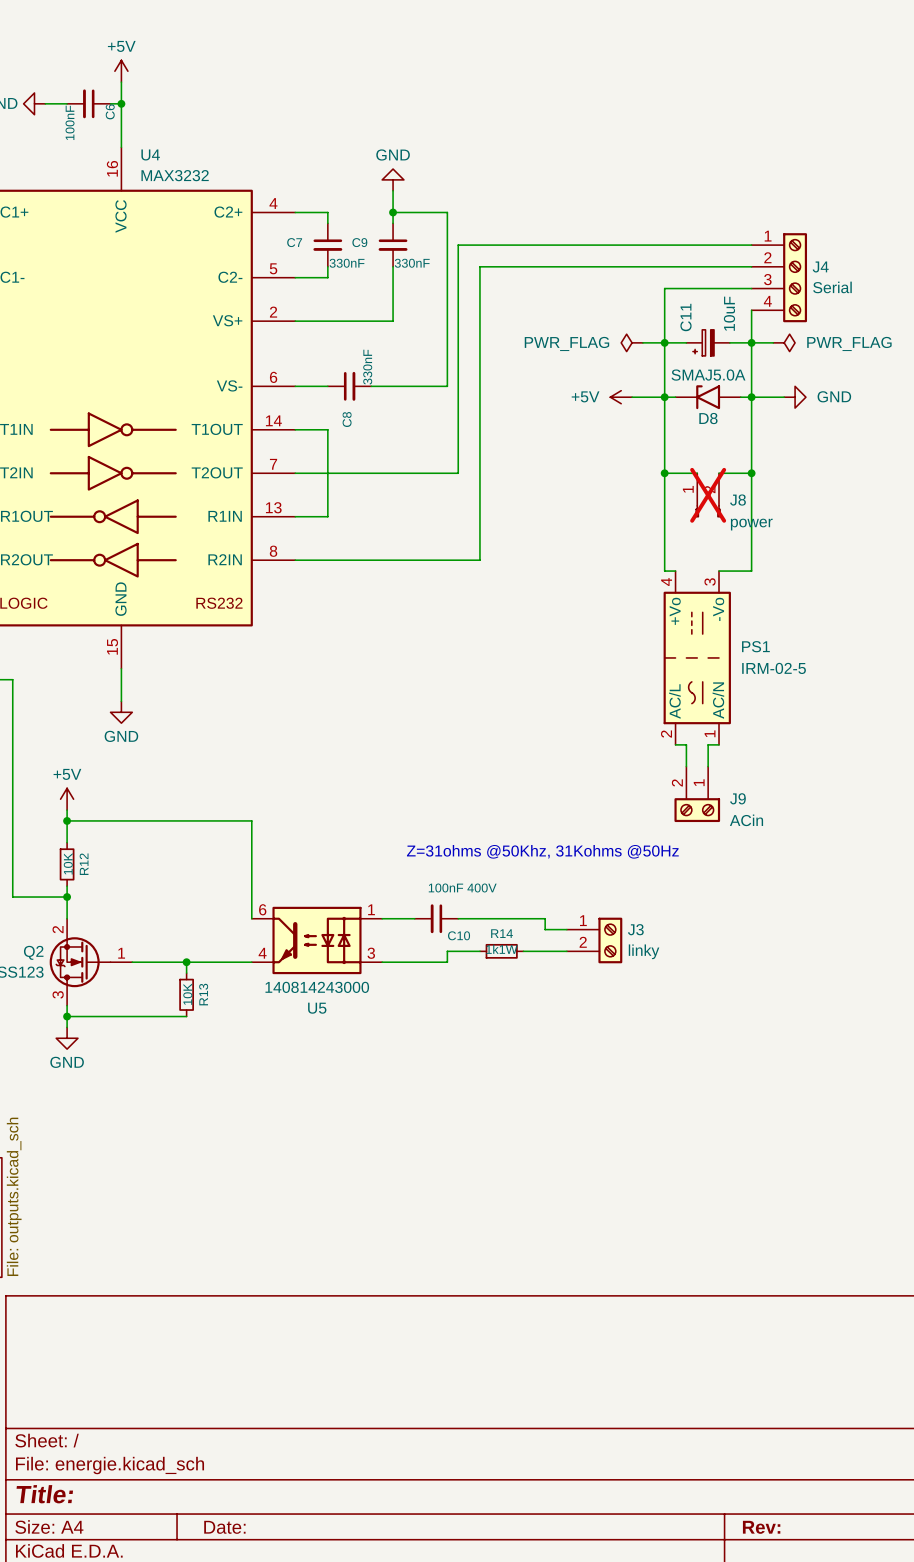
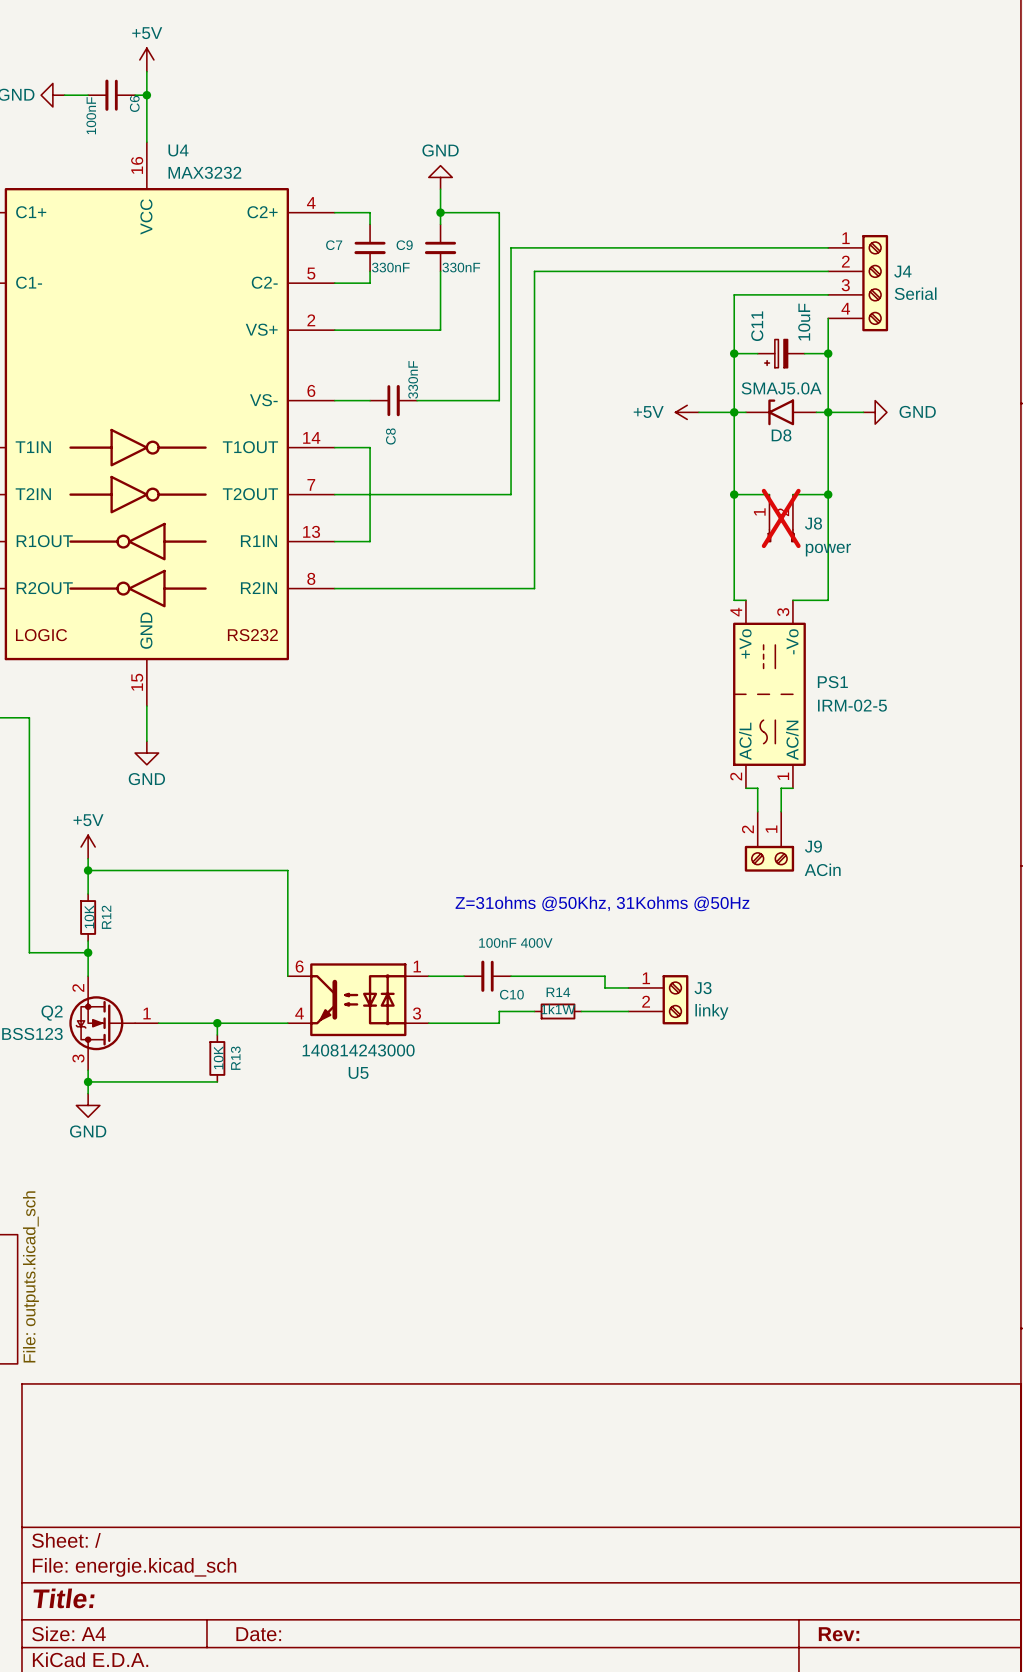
power symbol: PWR_FLAG (632, 342) -> none
wire: (642, 342) (664, 342) -> none
wire: (751, 342) (773, 342) -> none
power symbol: PWR_FLAG (784, 342) -> none

